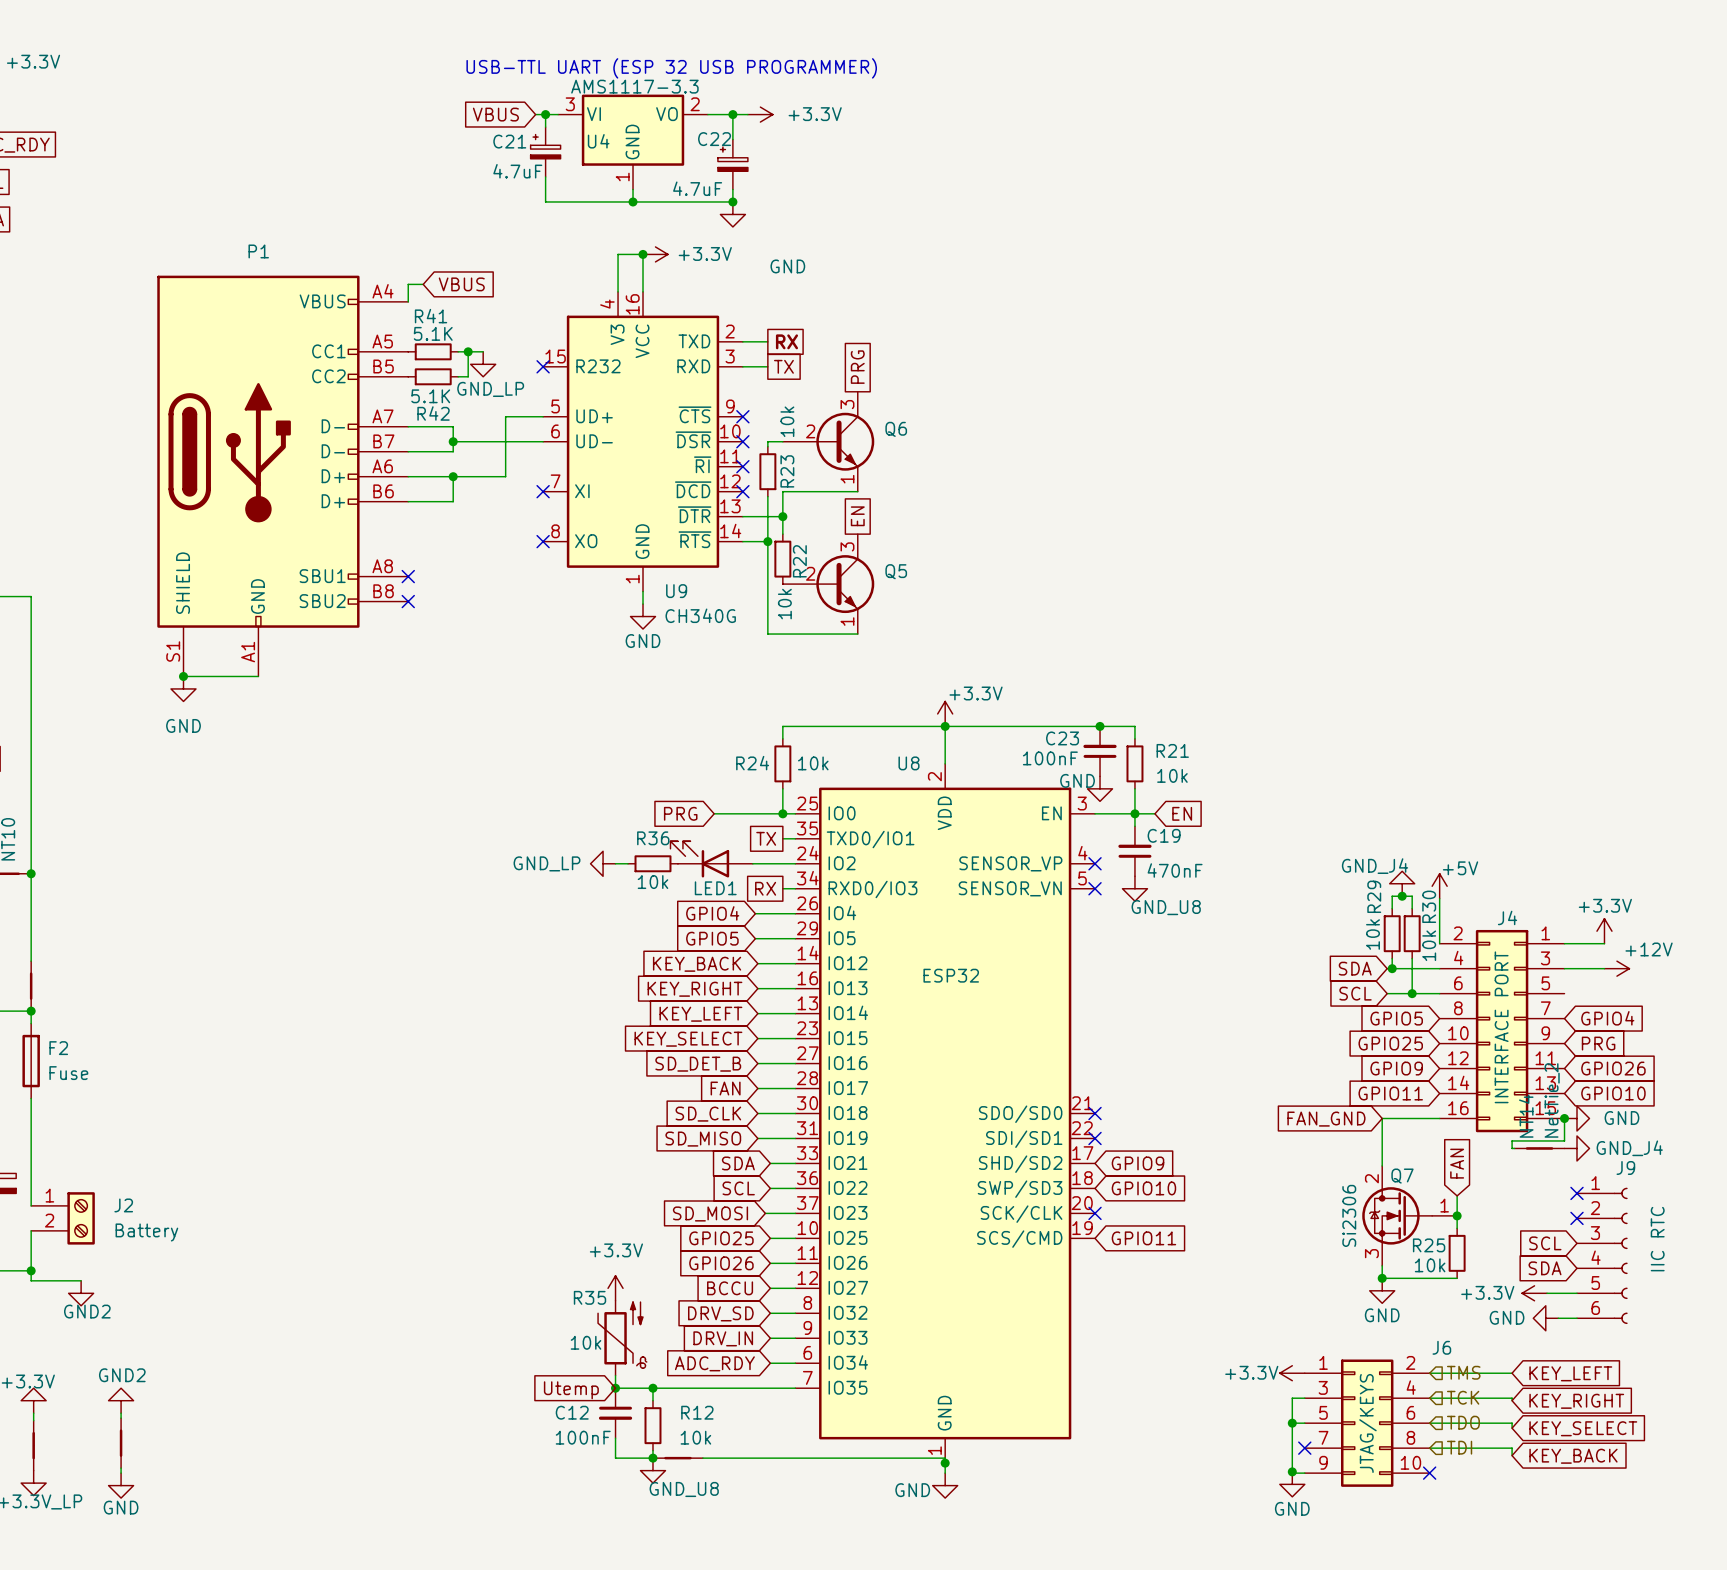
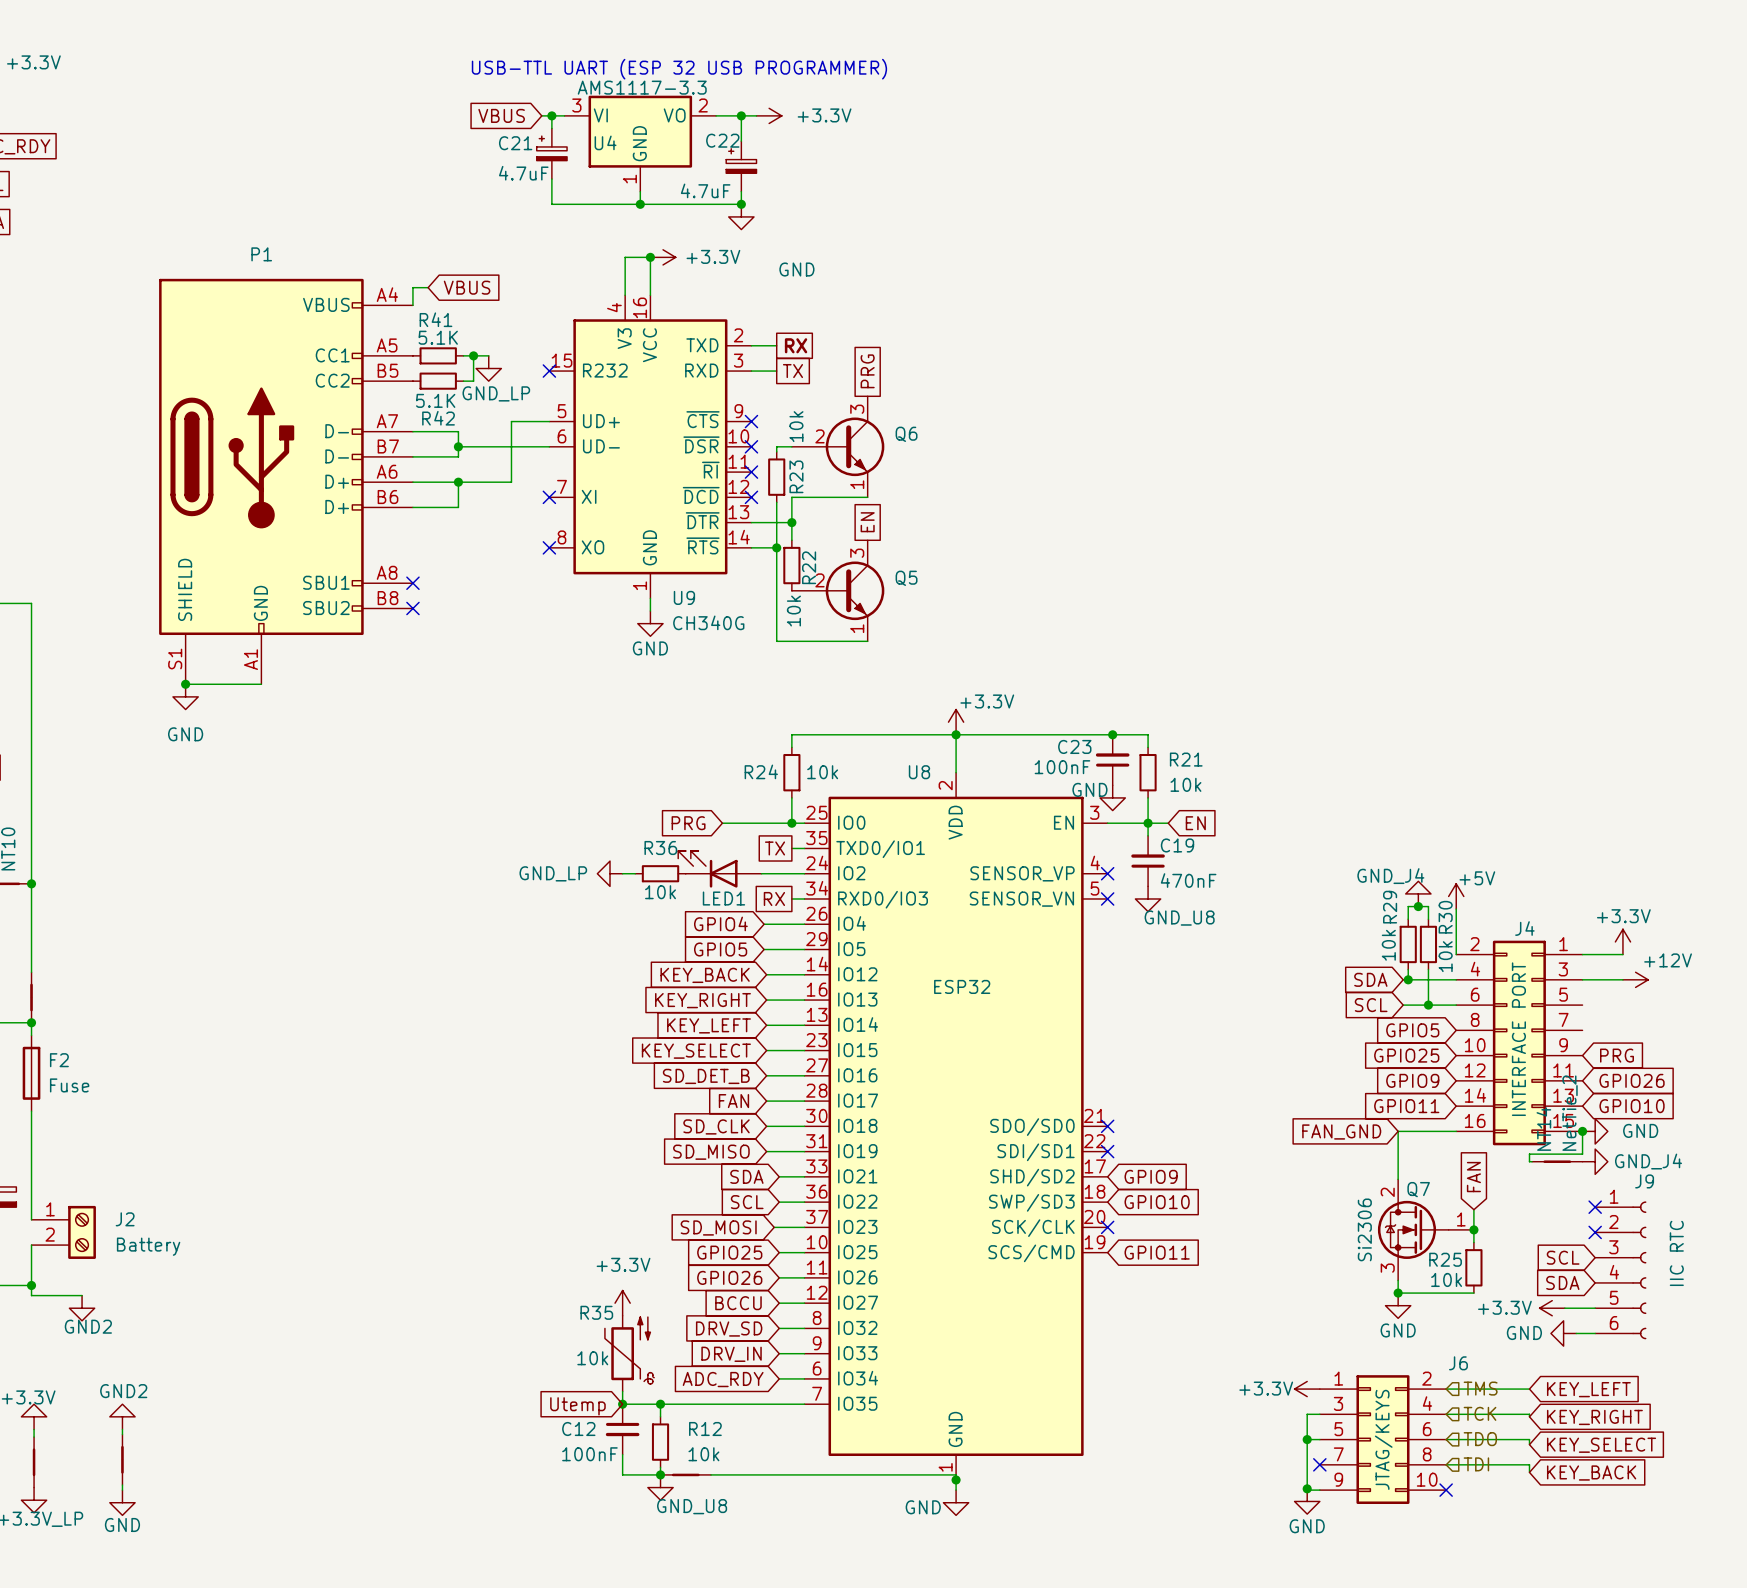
global label: GPIO4 (1607, 1018) -> none

